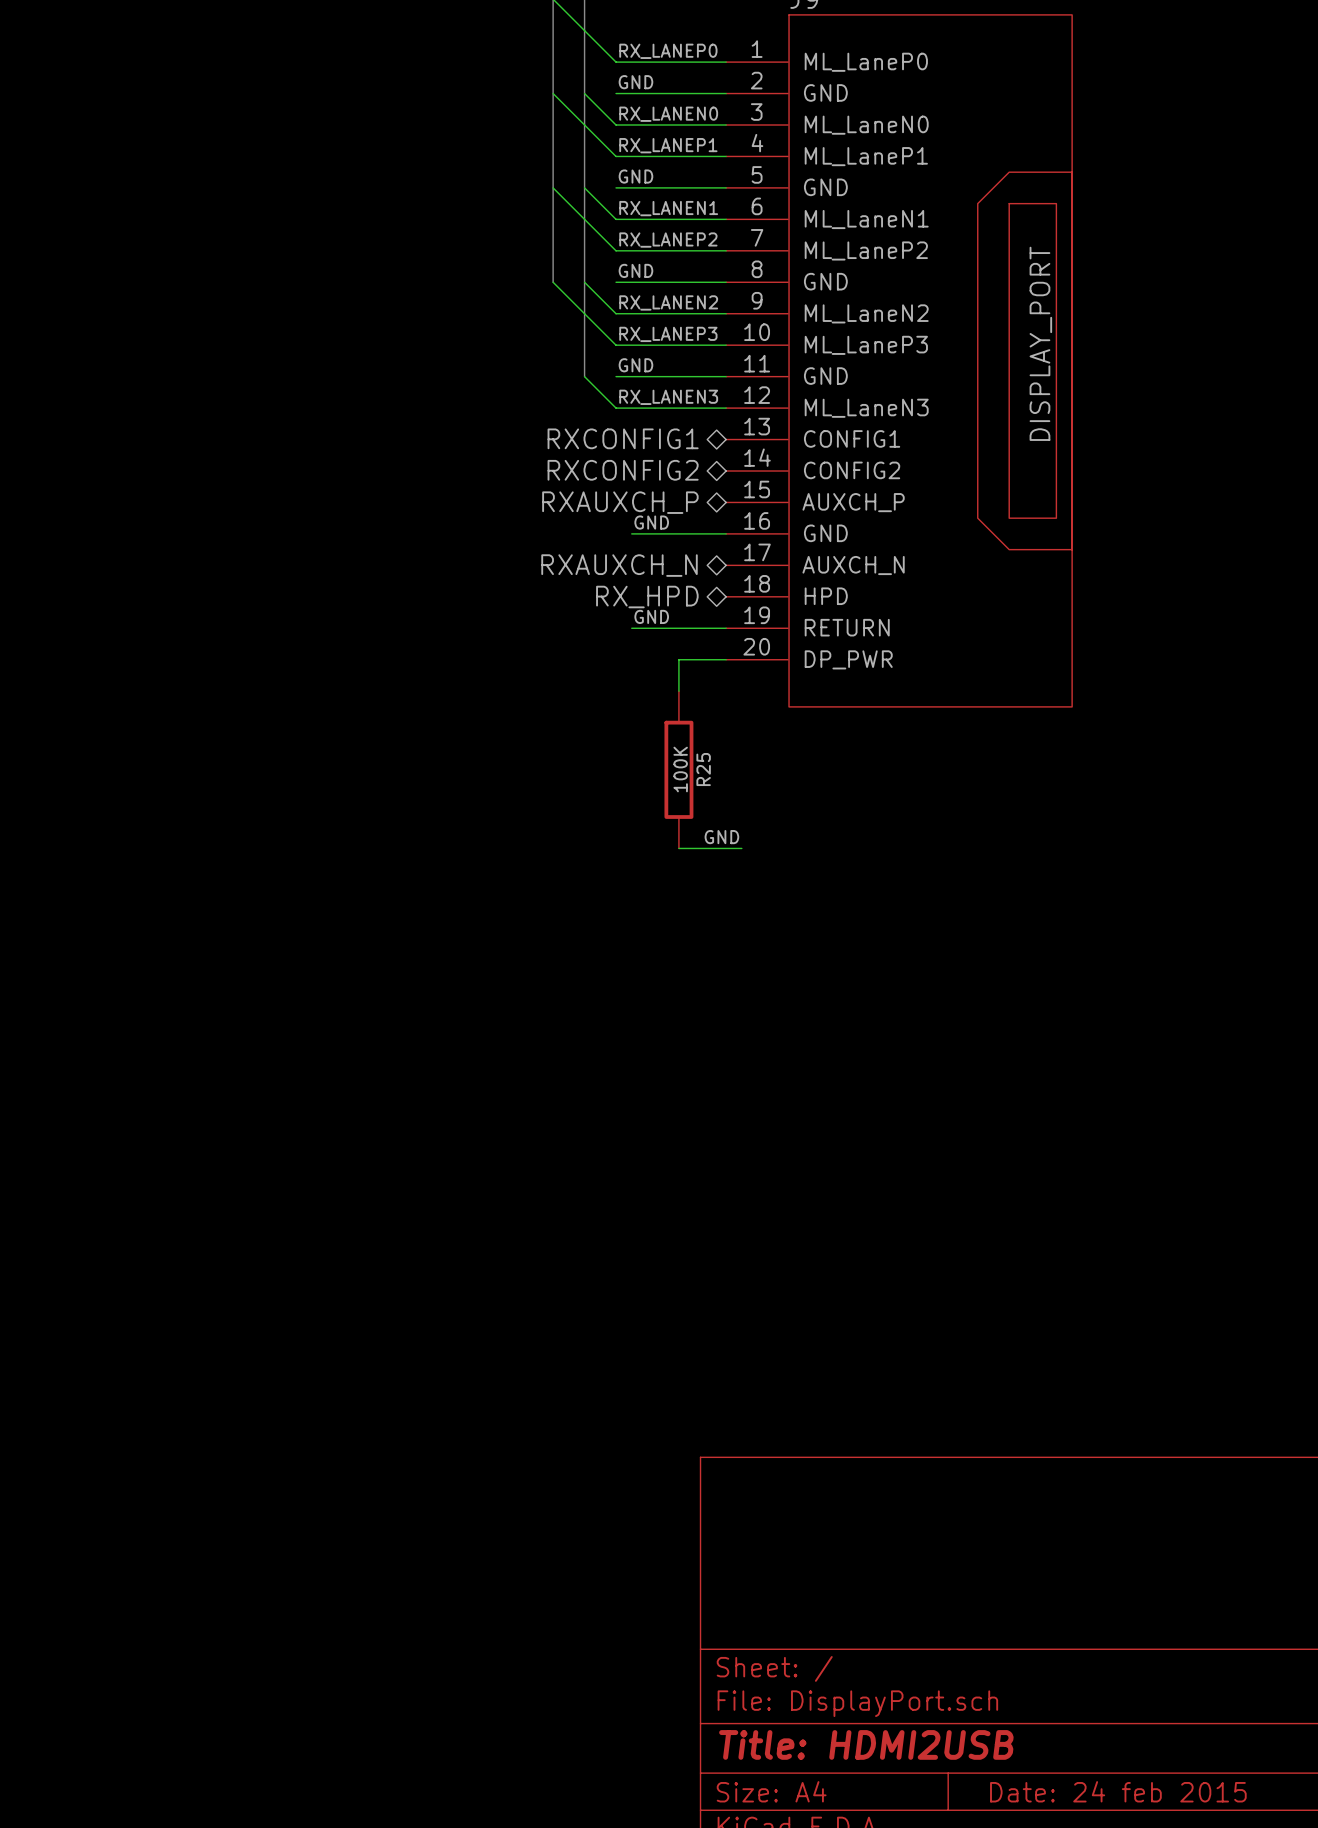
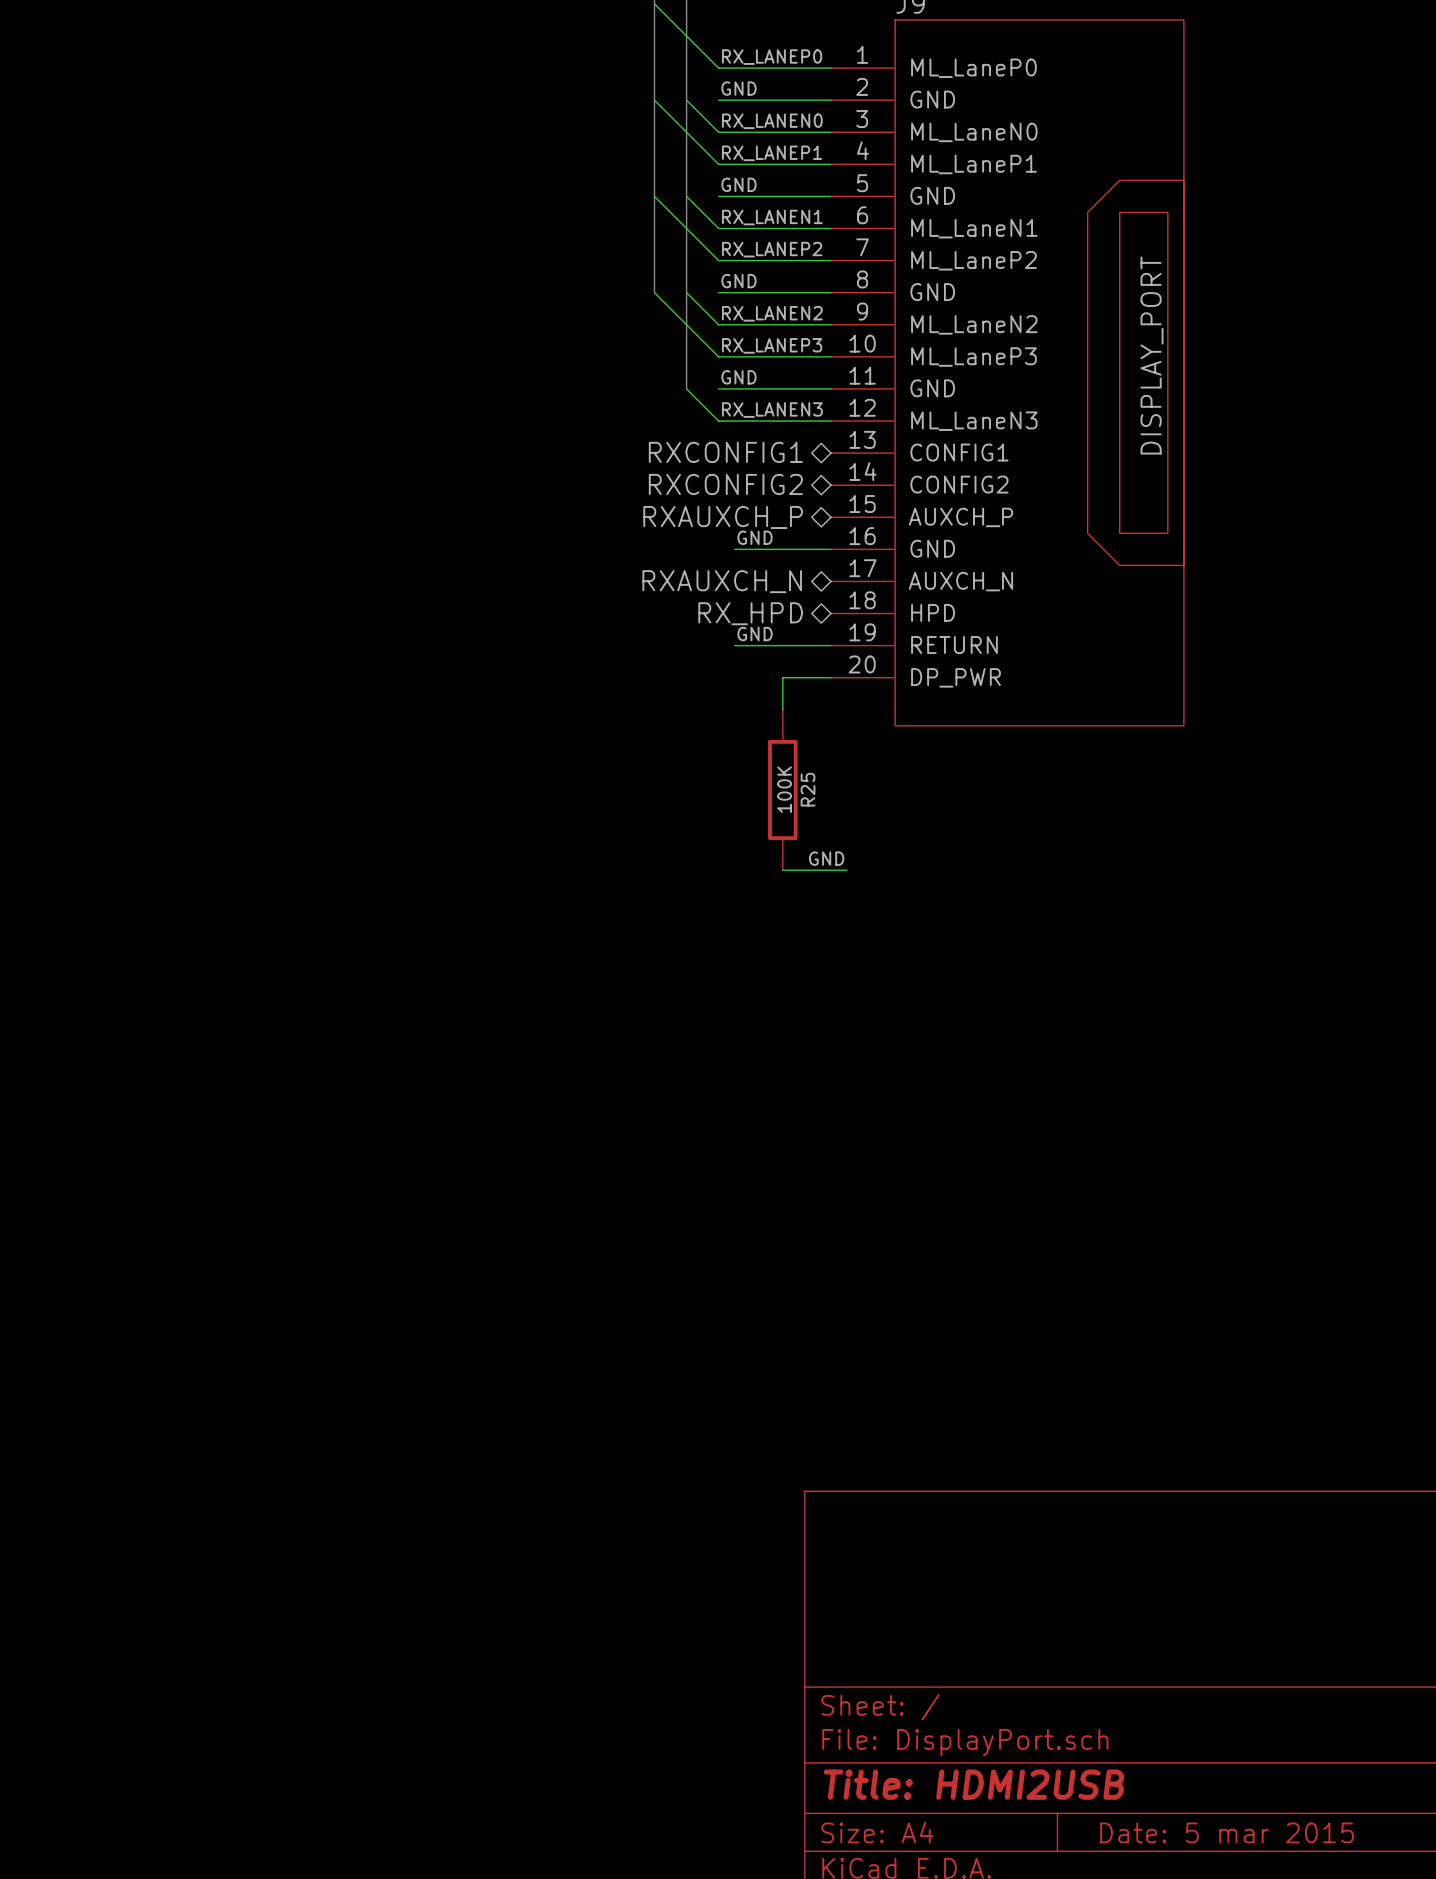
title block: Date: 24 feb 2015 (1118, 1791) -> Date: 5 mar 2015 (1227, 1832)

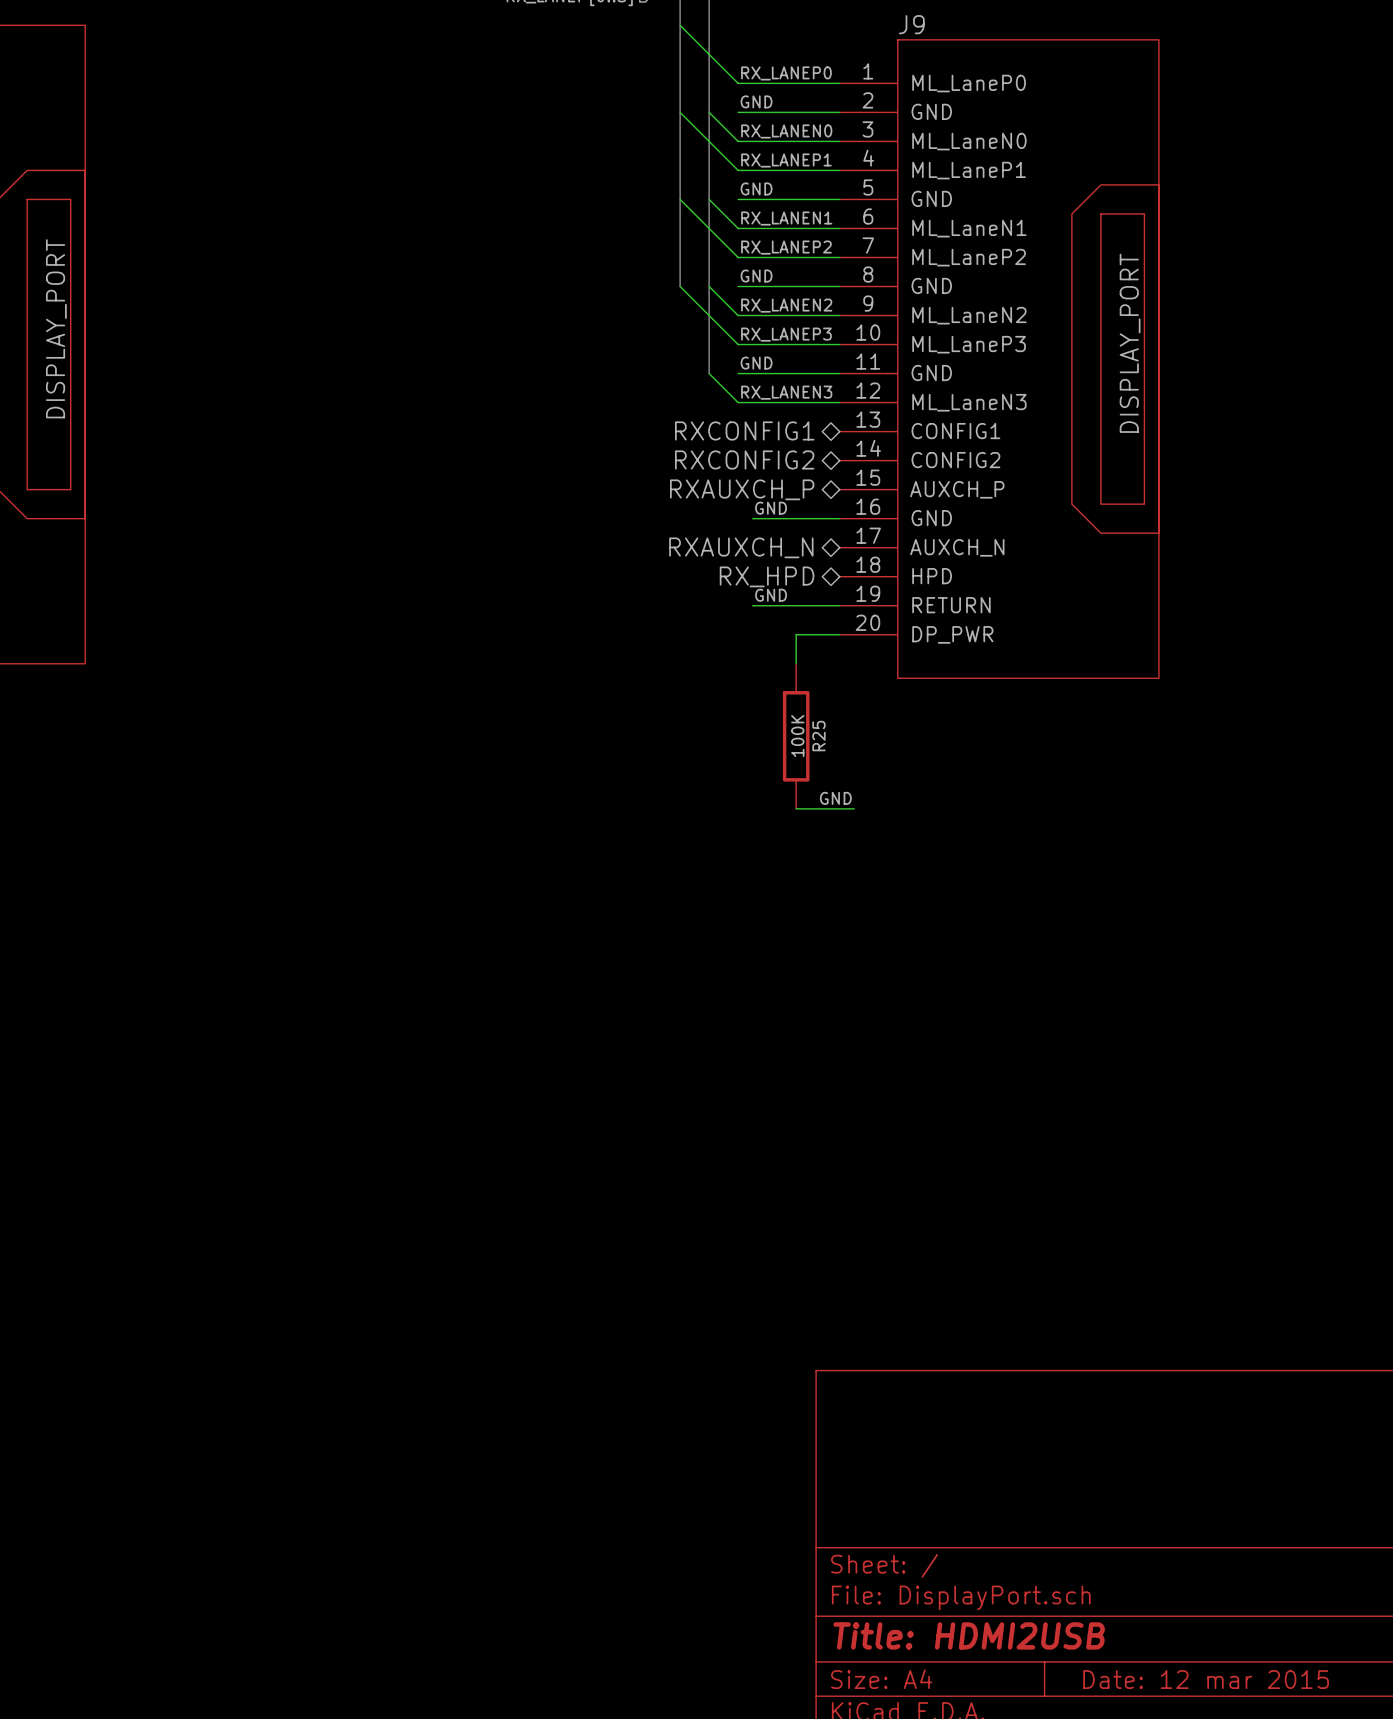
title block: Date: 5 mar 2015 (1227, 1832) -> Date: 12 mar 2015 (1206, 1679)

